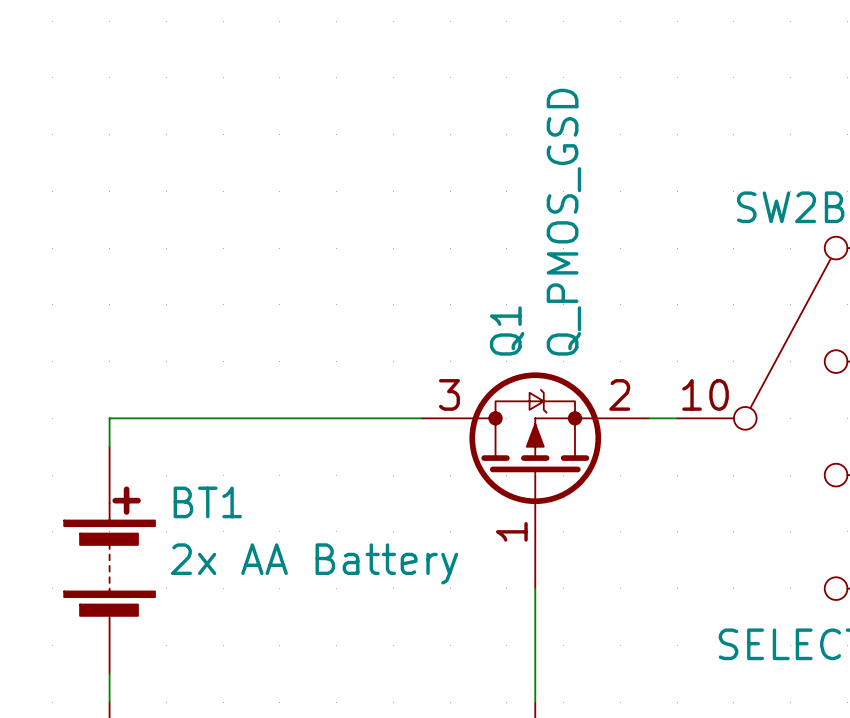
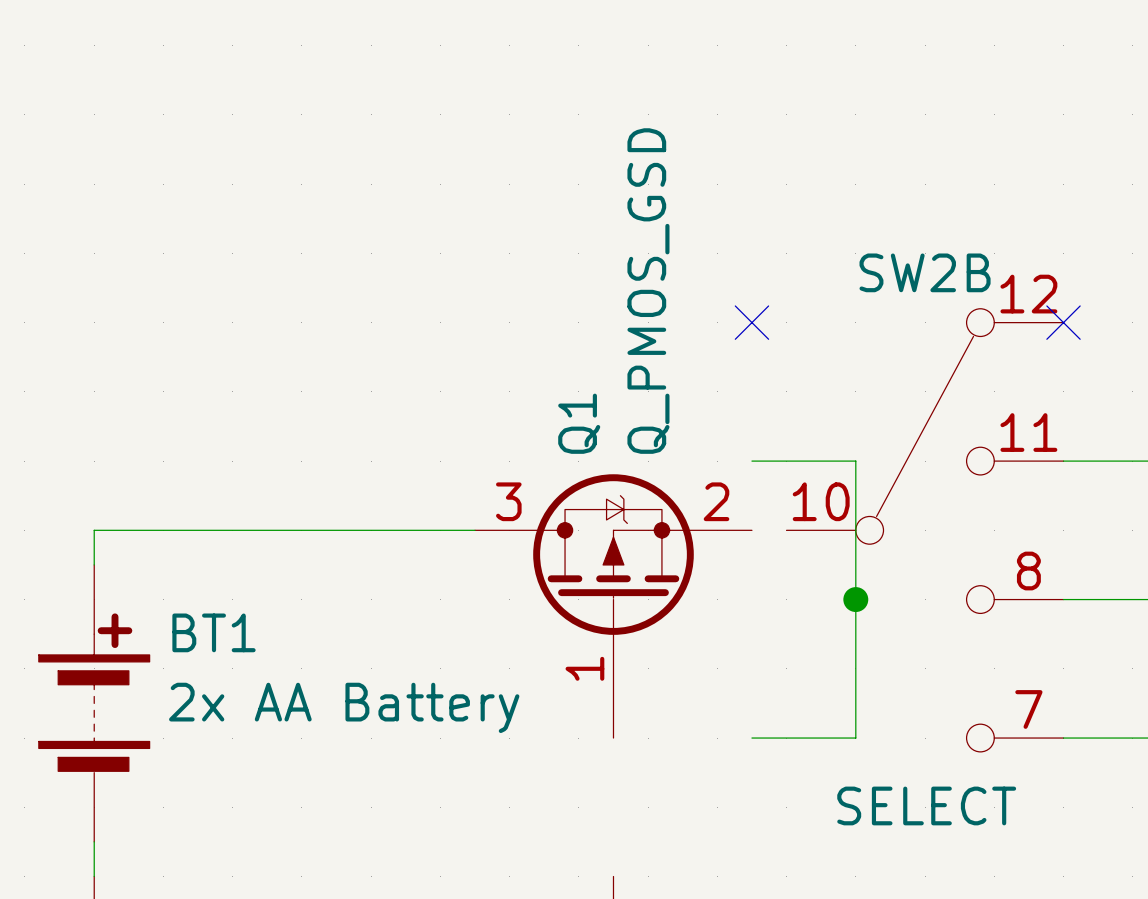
no-connect mark: none -> (751, 322)
wire: none -> (751, 461) (855, 461) (855, 738) (751, 738)
wire: (648, 418) (677, 418) -> none
junction: none -> (855, 599)
wire: (535, 588) (535, 702) -> none

